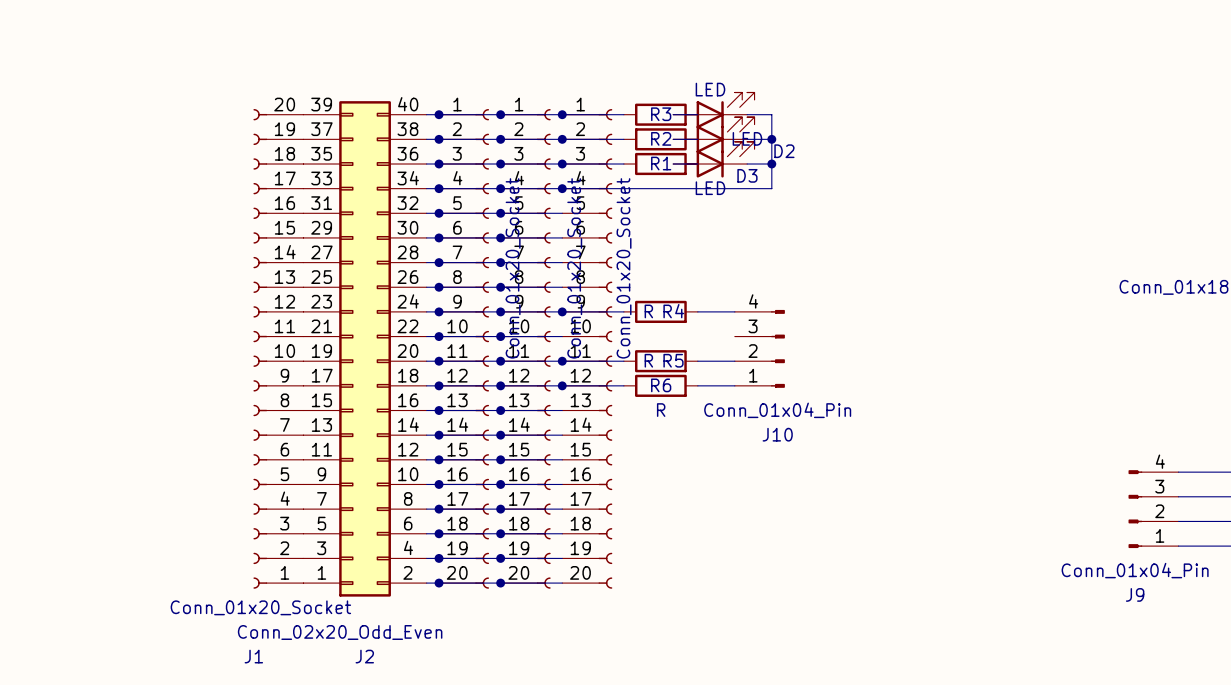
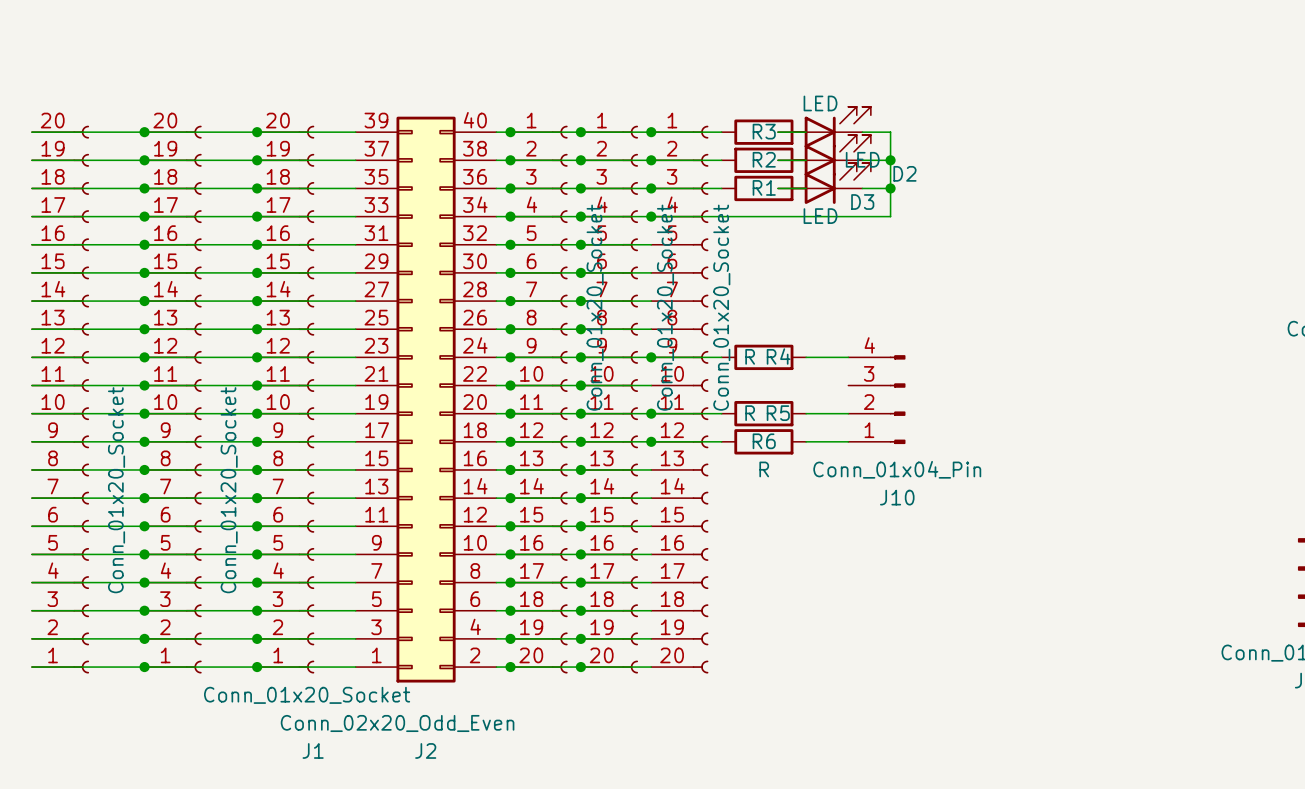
wire: none -> (31, 132) (355, 132)
junction: none -> (144, 132)
junction: none -> (257, 132)
wire: none -> (31, 160) (355, 160)
junction: none -> (144, 160)
junction: none -> (257, 160)
wire: none -> (31, 188) (355, 188)
junction: none -> (144, 188)
junction: none -> (257, 188)
wire: none -> (31, 216) (355, 216)
junction: none -> (144, 216)
junction: none -> (257, 216)
wire: none -> (31, 244) (355, 244)
junction: none -> (144, 244)
junction: none -> (257, 244)
wire: none -> (31, 272) (355, 272)
junction: none -> (144, 272)
junction: none -> (257, 272)
wire: none -> (31, 301) (355, 301)
junction: none -> (144, 301)
junction: none -> (257, 301)
wire: none -> (31, 329) (355, 329)
junction: none -> (144, 329)
junction: none -> (257, 329)
wire: none -> (31, 357) (355, 357)
junction: none -> (144, 357)
junction: none -> (257, 357)
wire: none -> (31, 385) (355, 385)
junction: none -> (144, 385)
junction: none -> (257, 385)
part: none -> Conn_01x20_Socket (60, 399)
part: none -> Conn_01x20_Socket (173, 399)
J1 flip: as is (260, 348) -> left-right (306, 399)
wire: none -> (31, 413) (355, 413)
junction: none -> (144, 413)
junction: none -> (257, 413)
wire: none -> (31, 441) (355, 441)
junction: none -> (144, 441)
junction: none -> (257, 441)
wire: none -> (31, 469) (355, 469)
junction: none -> (144, 469)
junction: none -> (257, 469)
wire: none -> (31, 498) (355, 498)
junction: none -> (144, 498)
junction: none -> (257, 498)
wire: none -> (31, 526) (355, 526)
junction: none -> (144, 526)
junction: none -> (257, 526)
wire: none -> (31, 554) (355, 554)
junction: none -> (144, 554)
junction: none -> (257, 554)
wire: none -> (31, 582) (355, 582)
junction: none -> (144, 582)
junction: none -> (257, 582)
wire: none -> (31, 610) (355, 610)
junction: none -> (144, 610)
junction: none -> (257, 610)
wire: none -> (31, 638) (355, 638)
junction: none -> (144, 638)
junction: none -> (257, 638)
wire: none -> (31, 667) (355, 667)
junction: none -> (144, 667)
junction: none -> (257, 667)

